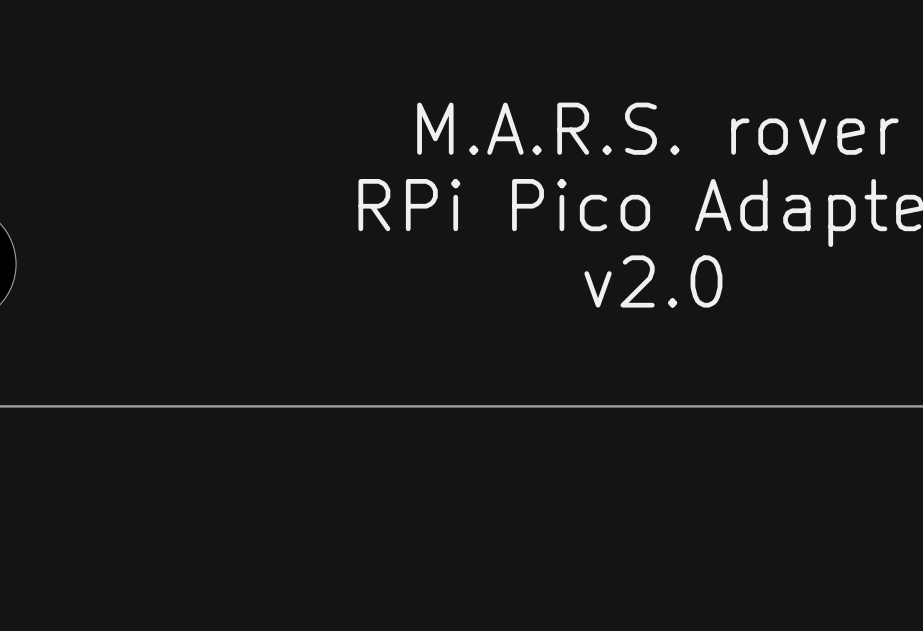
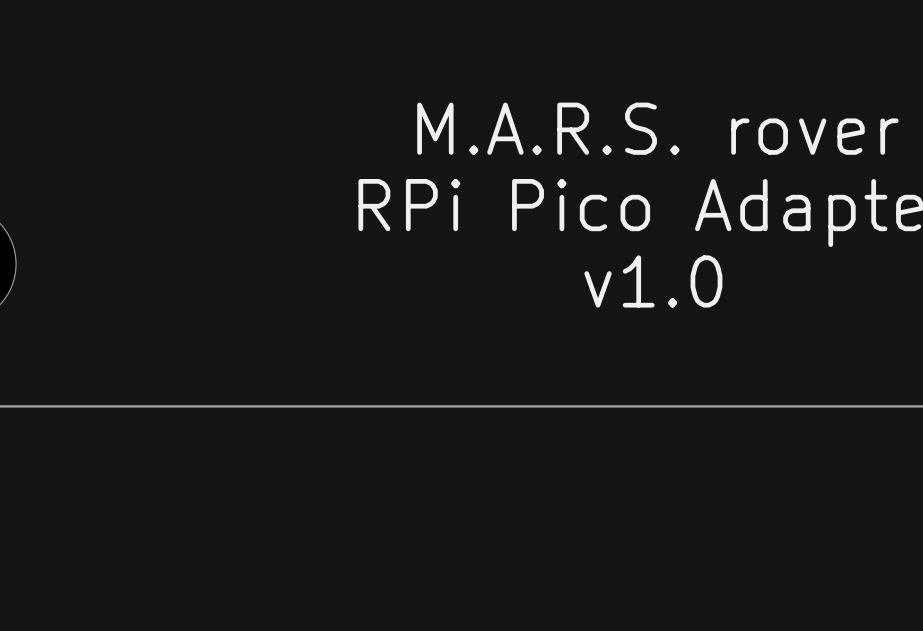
text: v2.0 (653, 281) -> v1.0 (653, 281)

